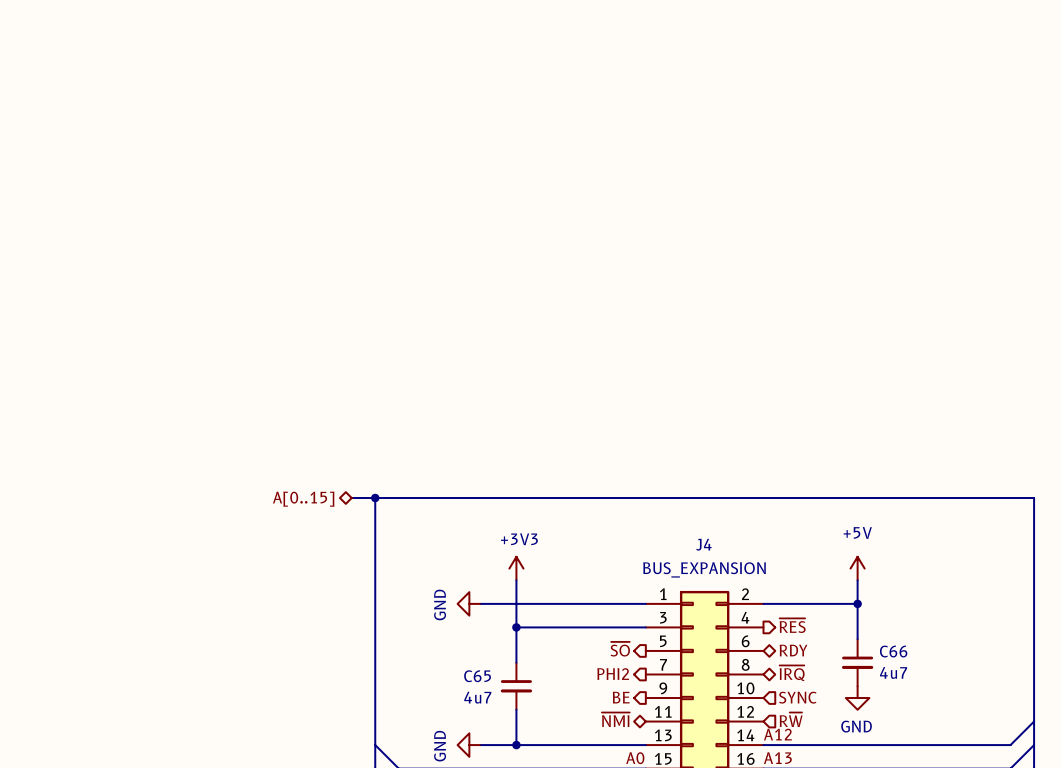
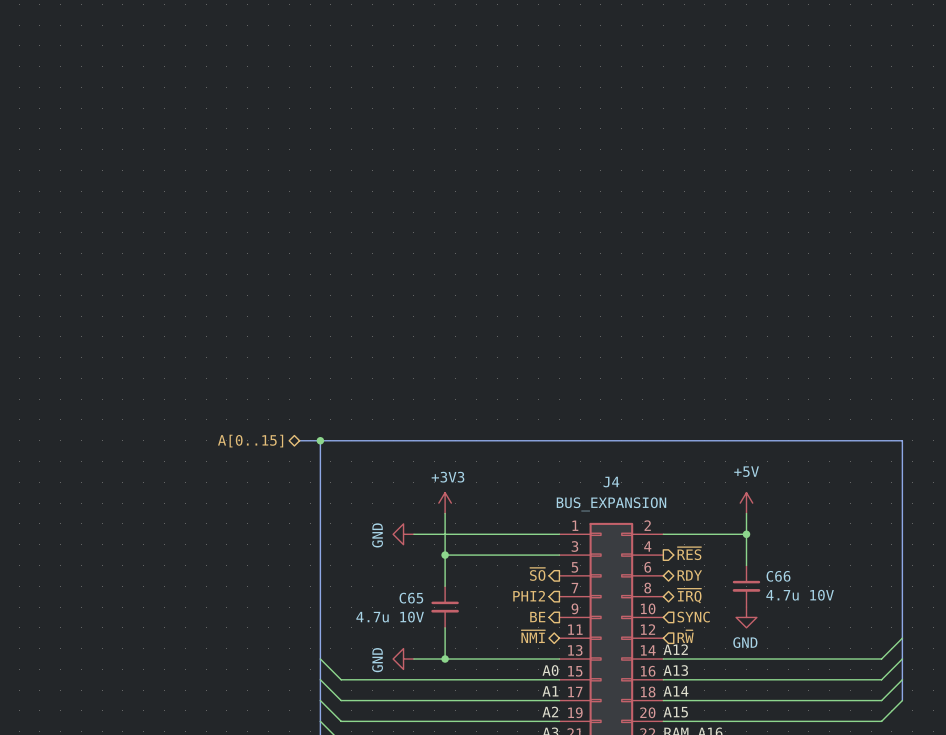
C66 value: 4u7 (893, 672) -> 4.7u 10V (800, 595)
C65 value: 4u7 (477, 697) -> 4.7u 10V (390, 617)

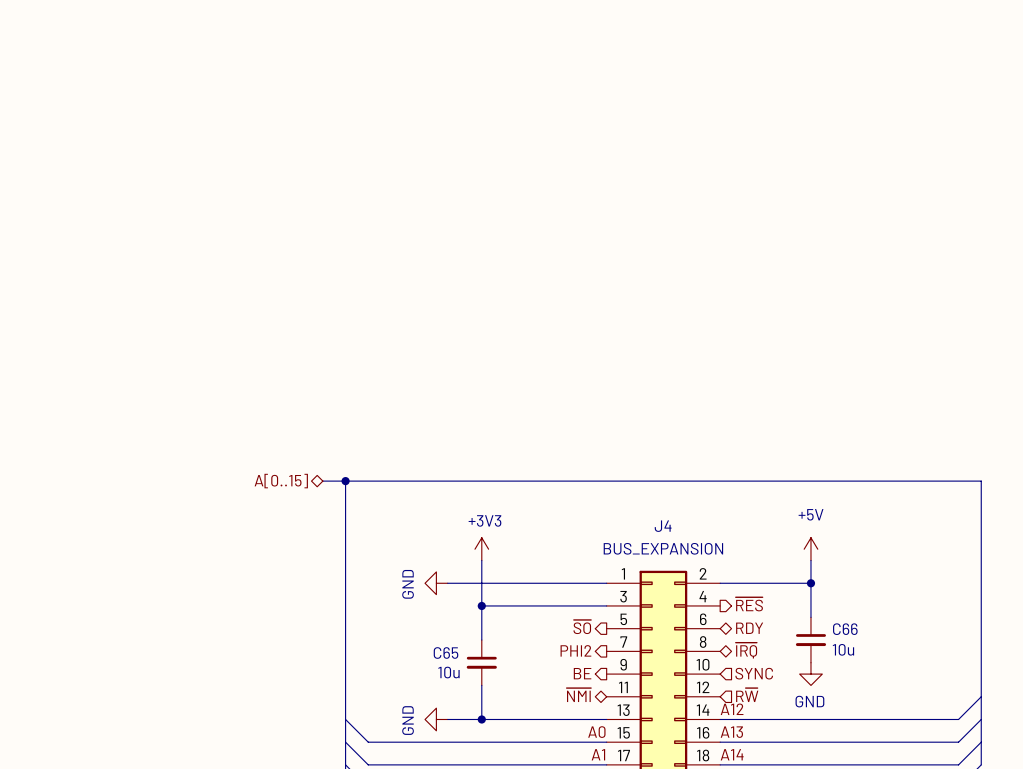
C66 value: 4.7u 10V (800, 595) -> 10u (843, 649)
C65 value: 4.7u 10V (390, 617) -> 10u (448, 672)

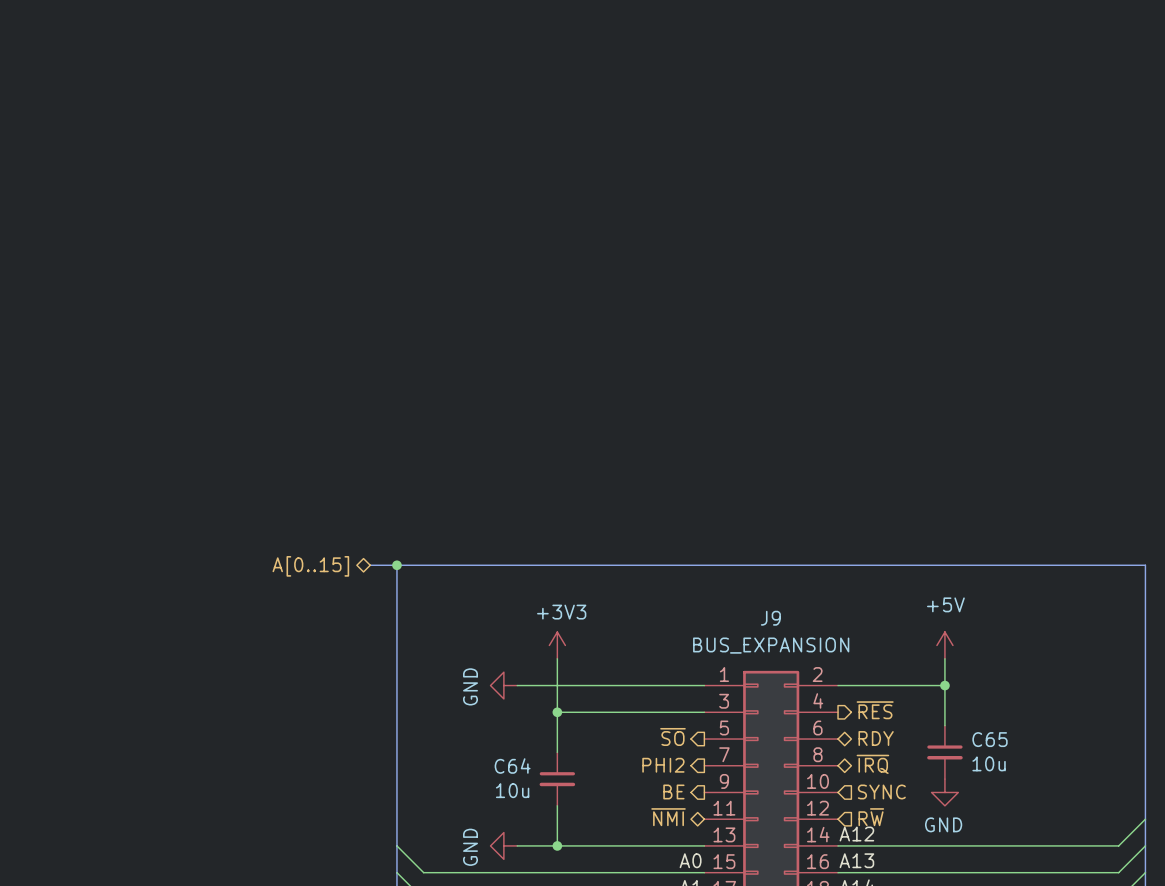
J4 name: J4 (663, 526) -> J9 (770, 618)
C66 name: C66 (845, 629) -> C65 (990, 739)
C65 name: C65 (446, 653) -> C64 (512, 766)

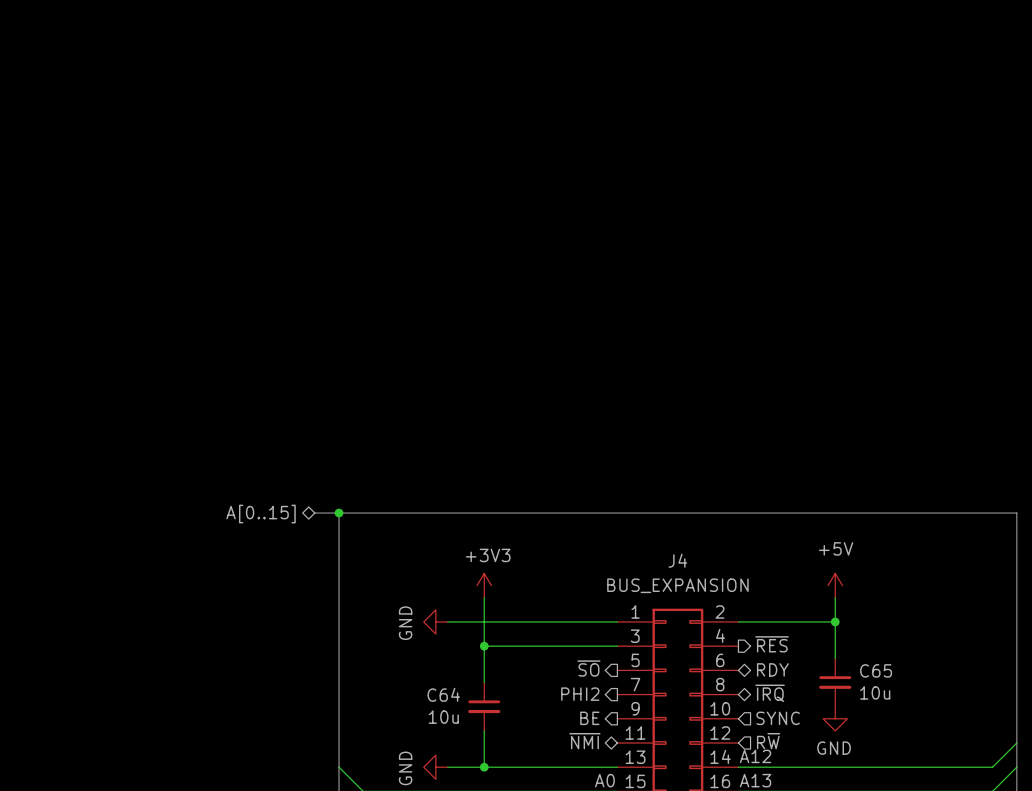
J9 name: J9 (770, 618) -> J4 (677, 560)

